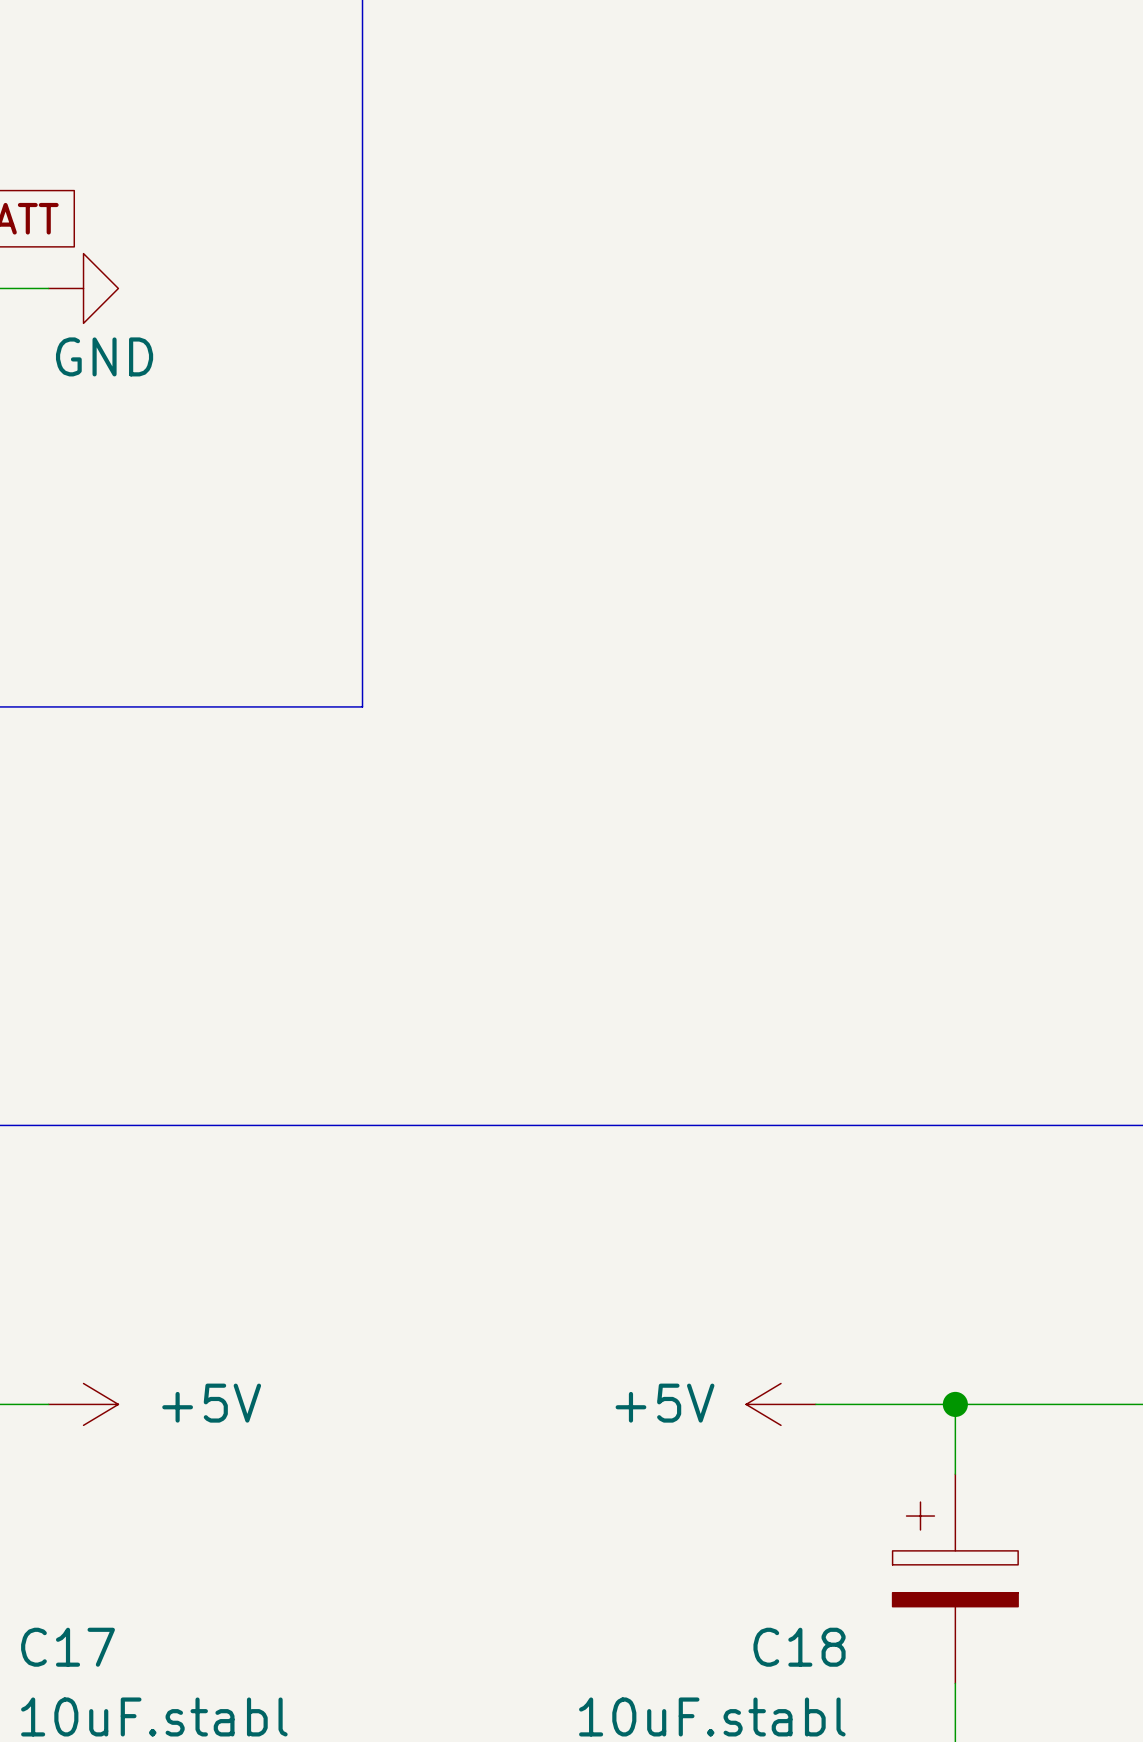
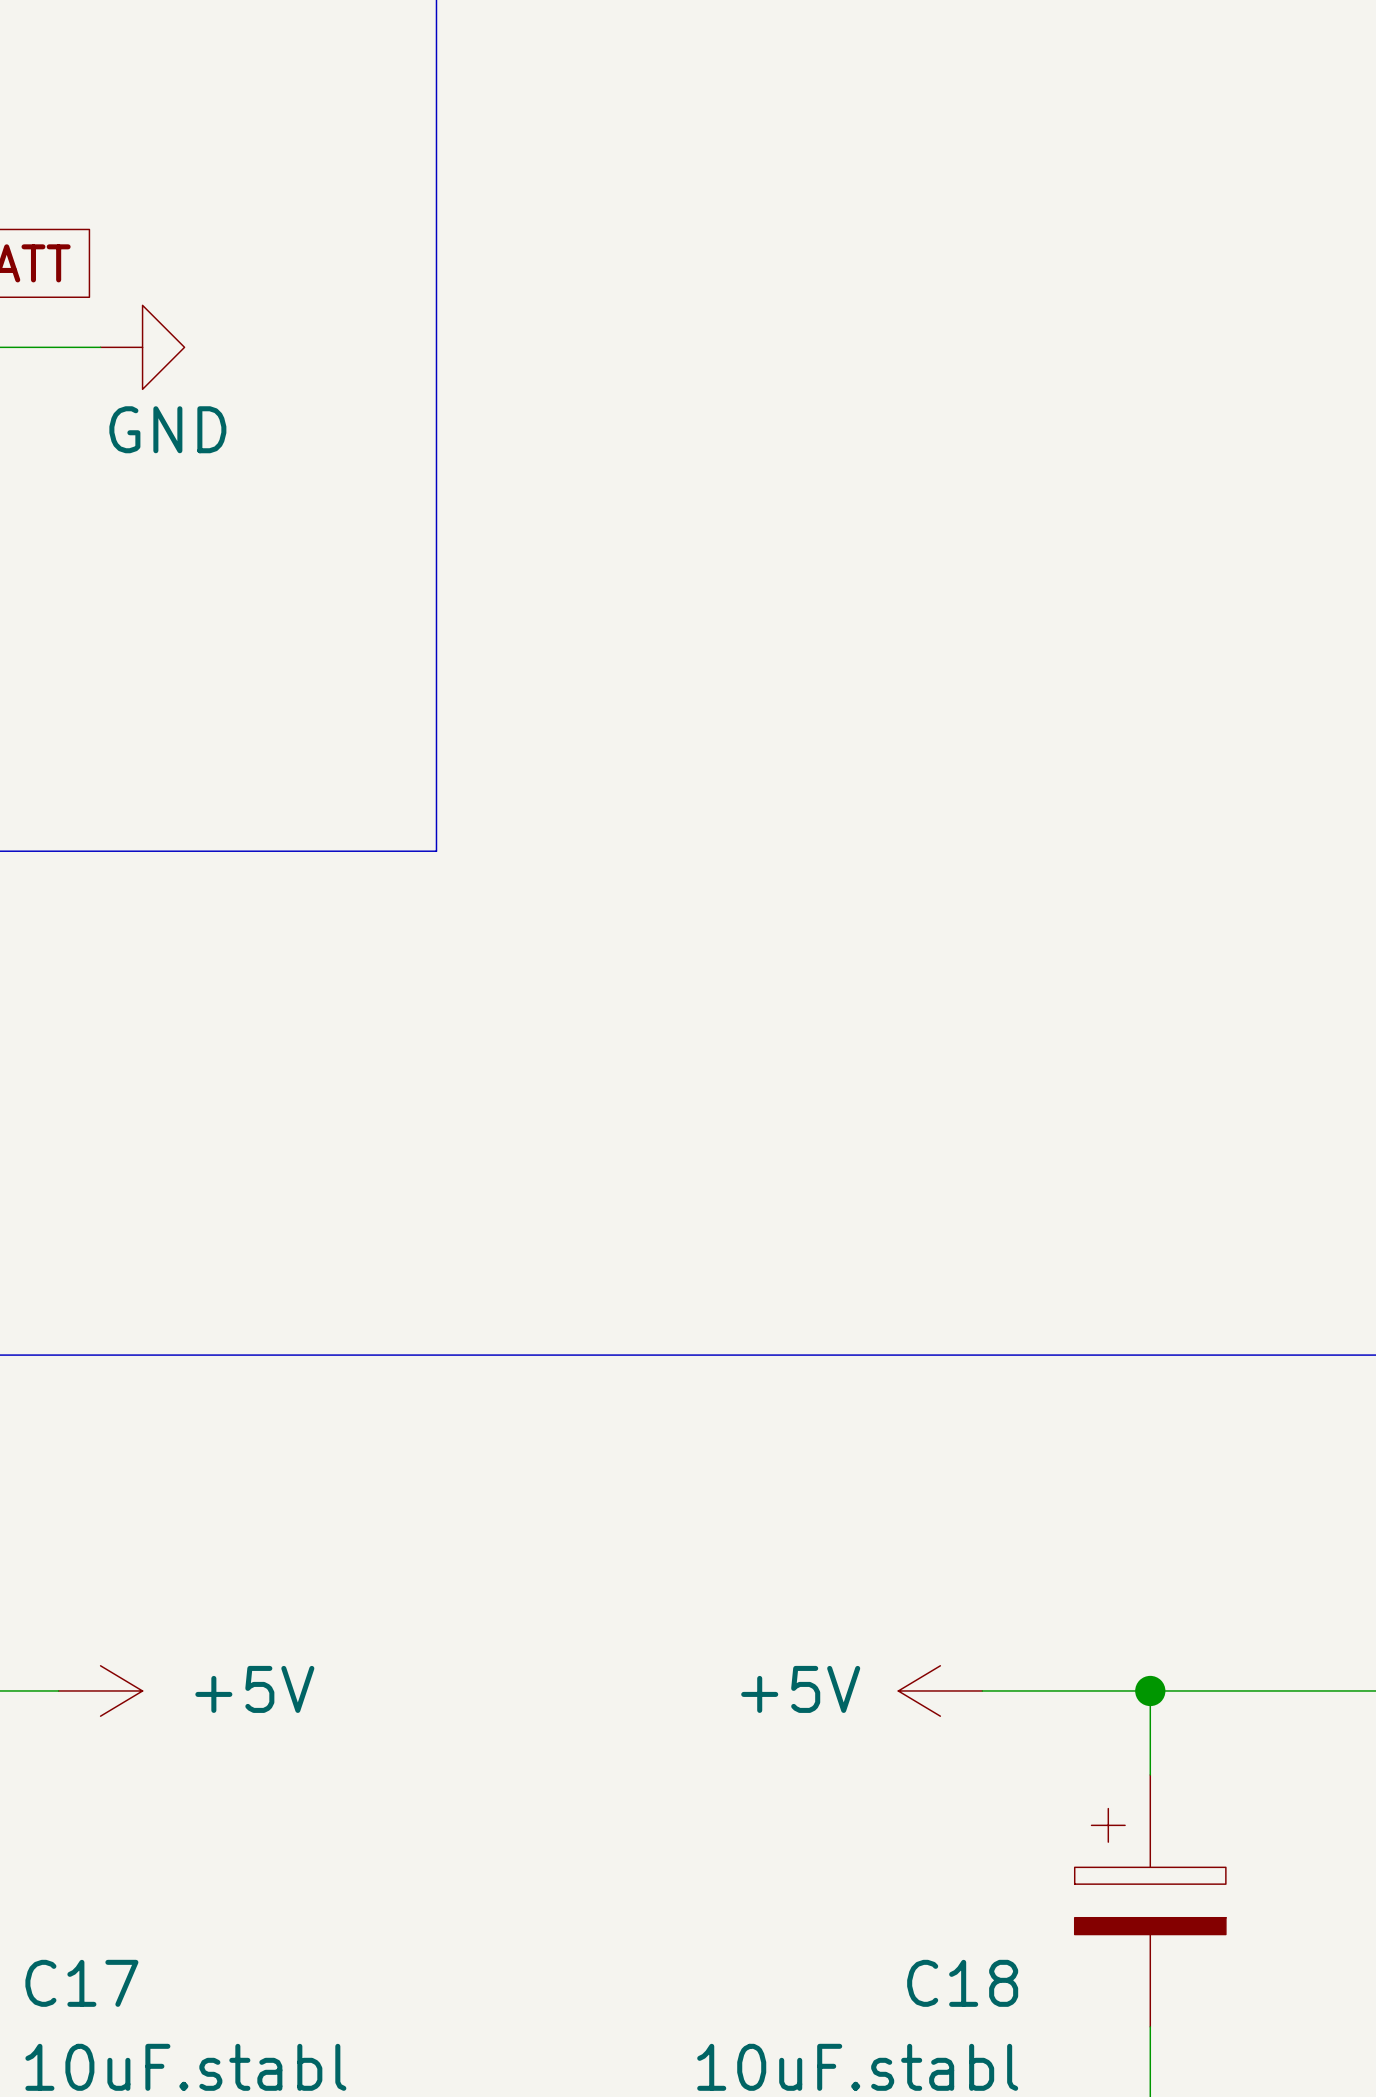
power symbol position: GND (83, 288) -> GND (142, 347)

